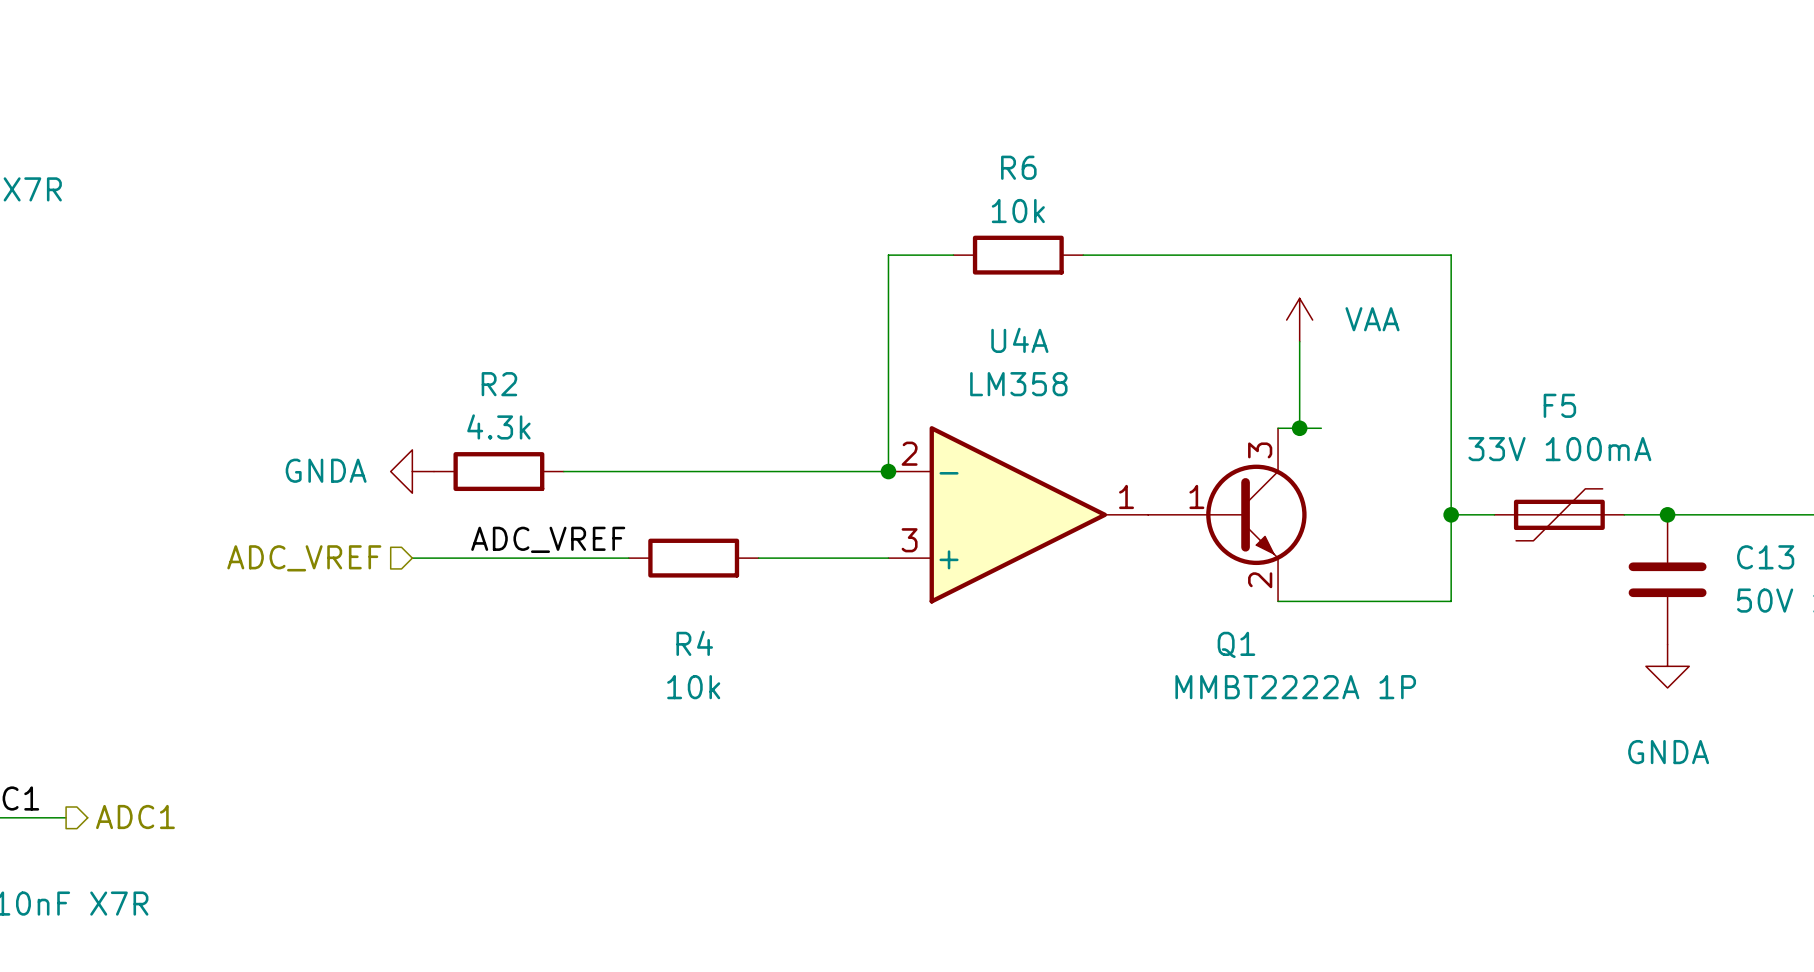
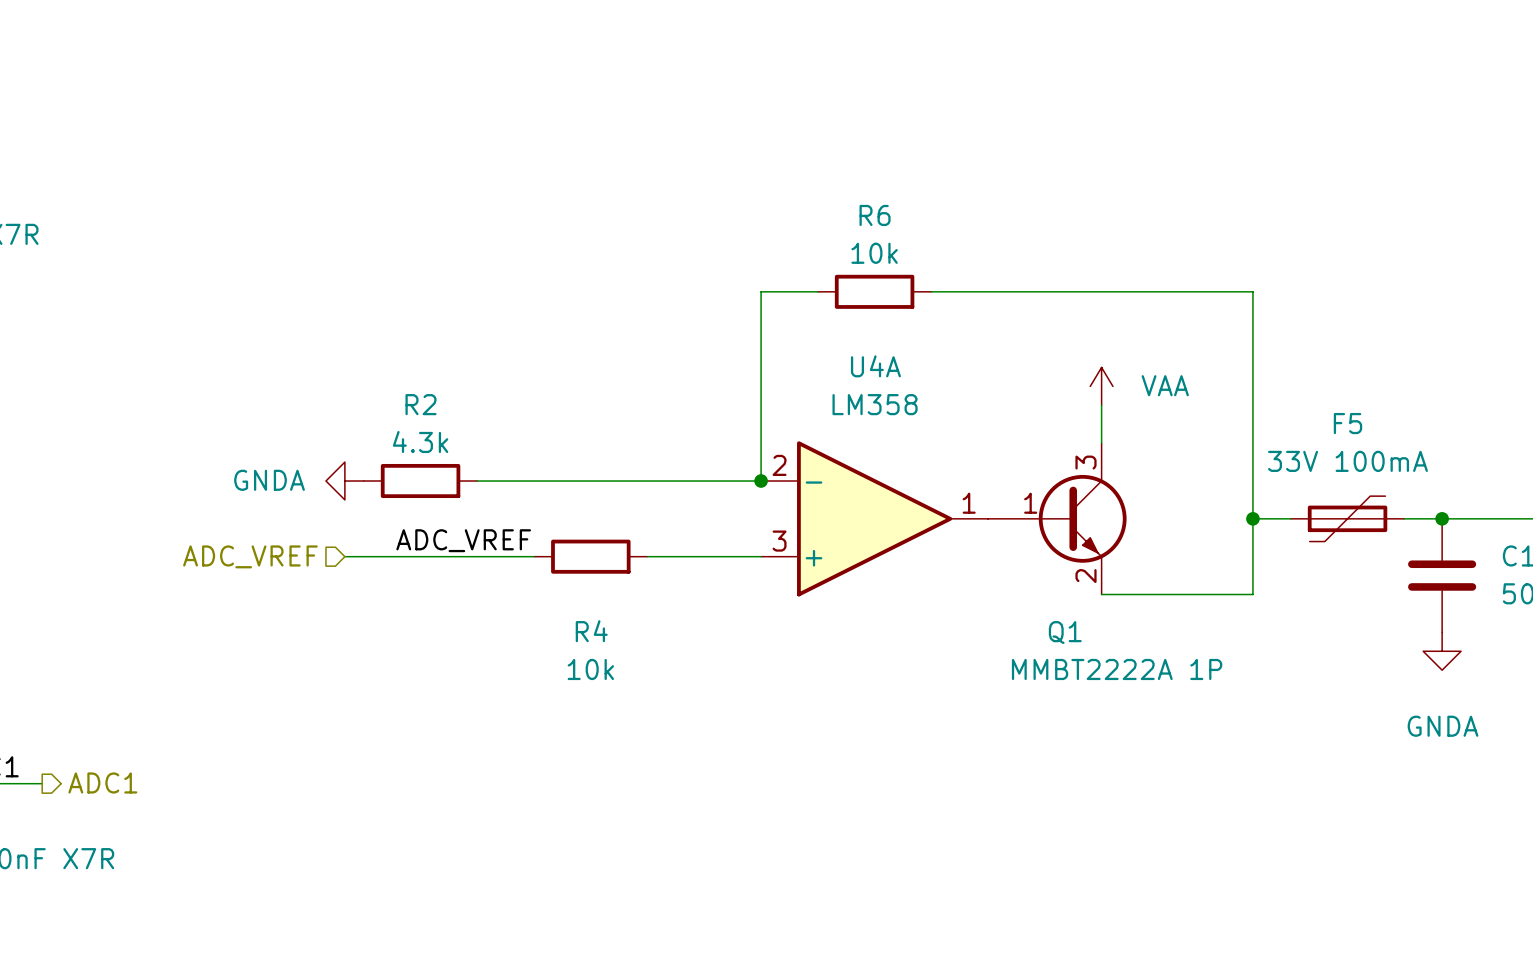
power symbol position: VAA (1299, 320) -> VAA (1101, 386)
wire: (1299, 341) (1299, 428) -> none
wire: (1278, 428) (1321, 428) -> (1101, 443) (1101, 405)
junction: (1299, 428) -> none

